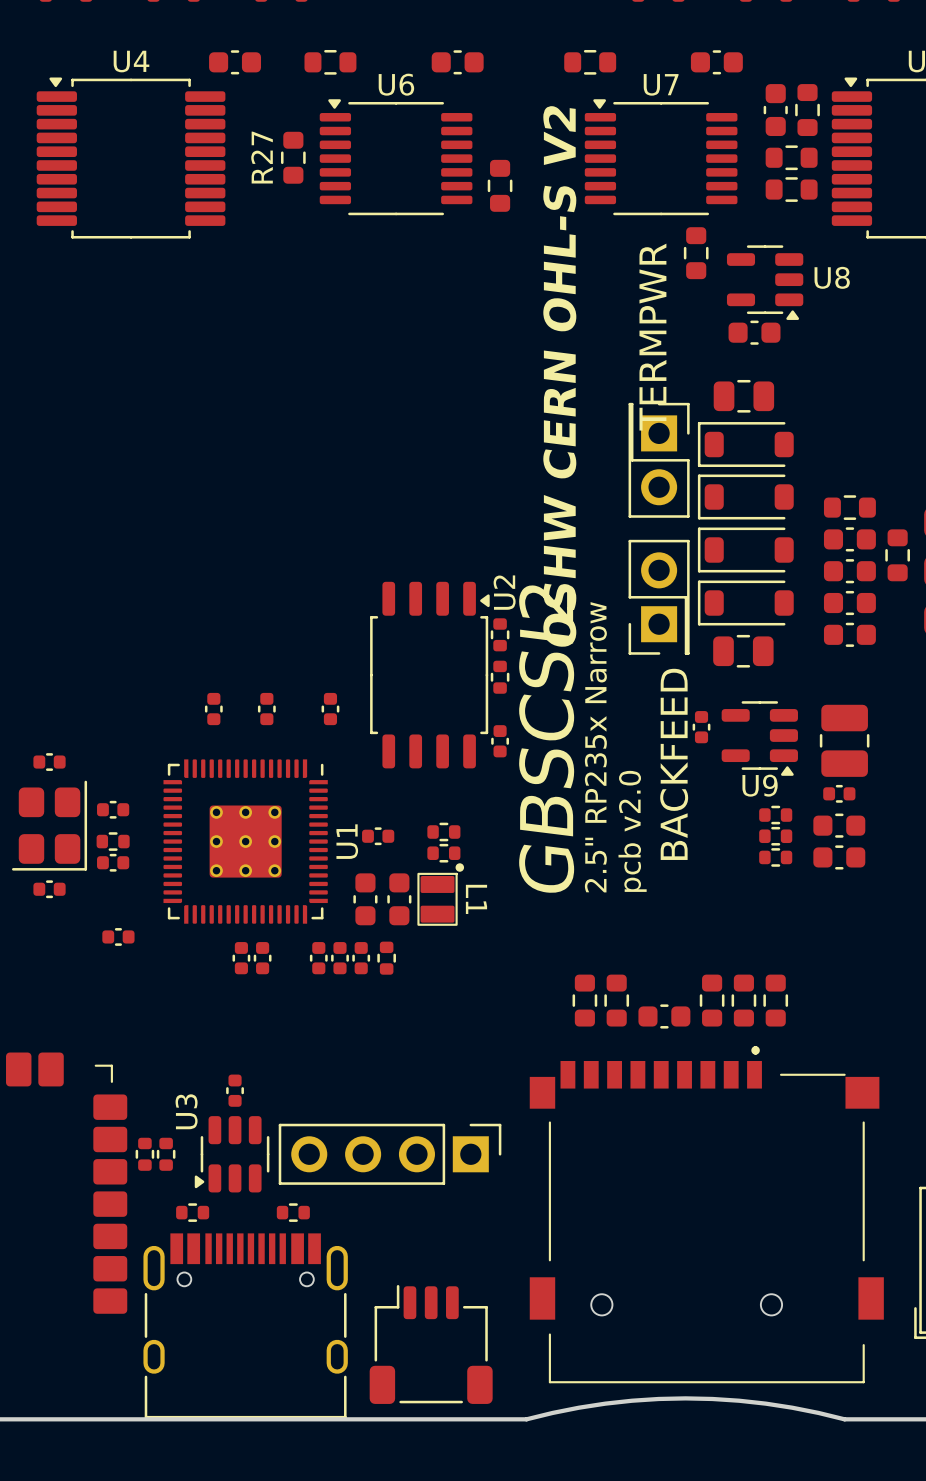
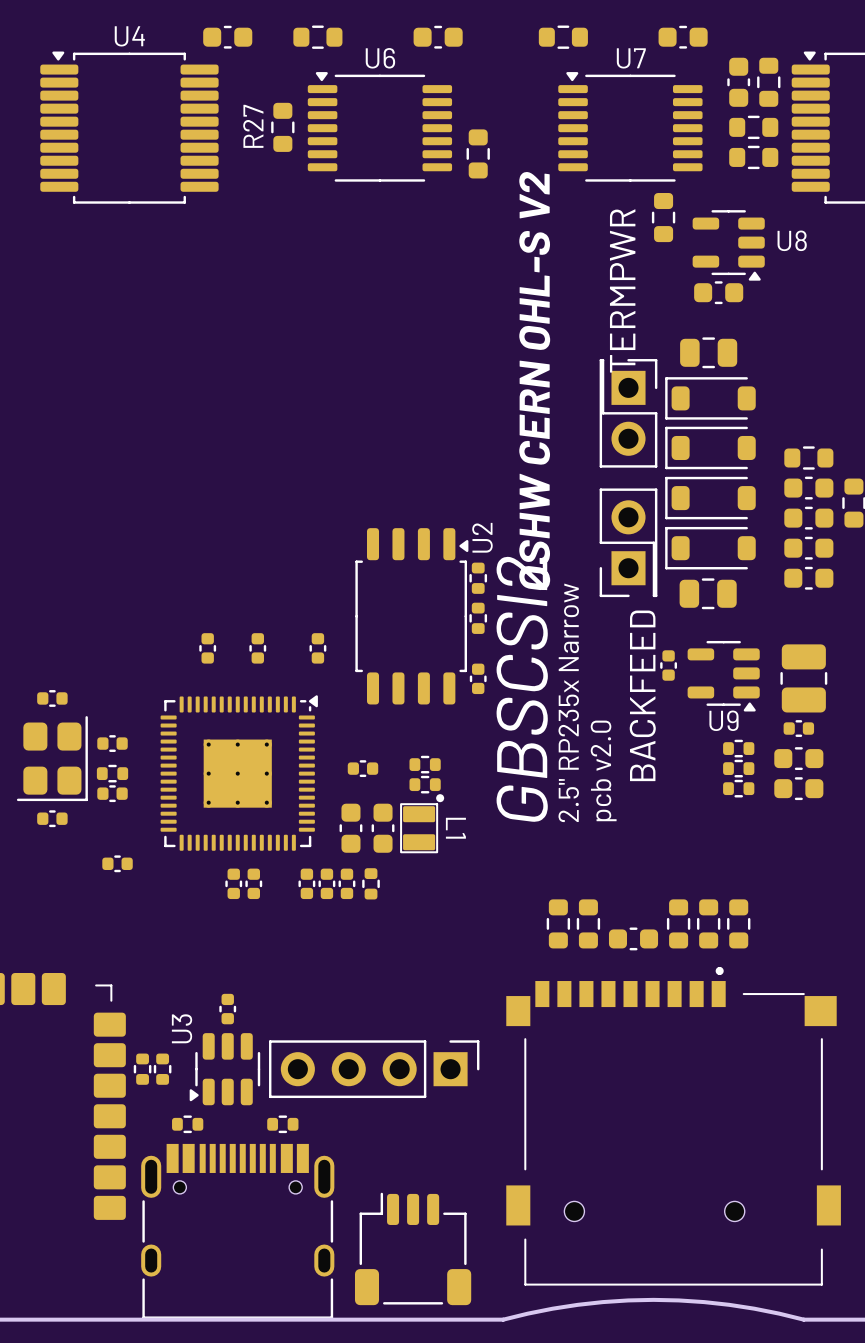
part: none -> (239, 773)
U1: (245, 841) -> none

